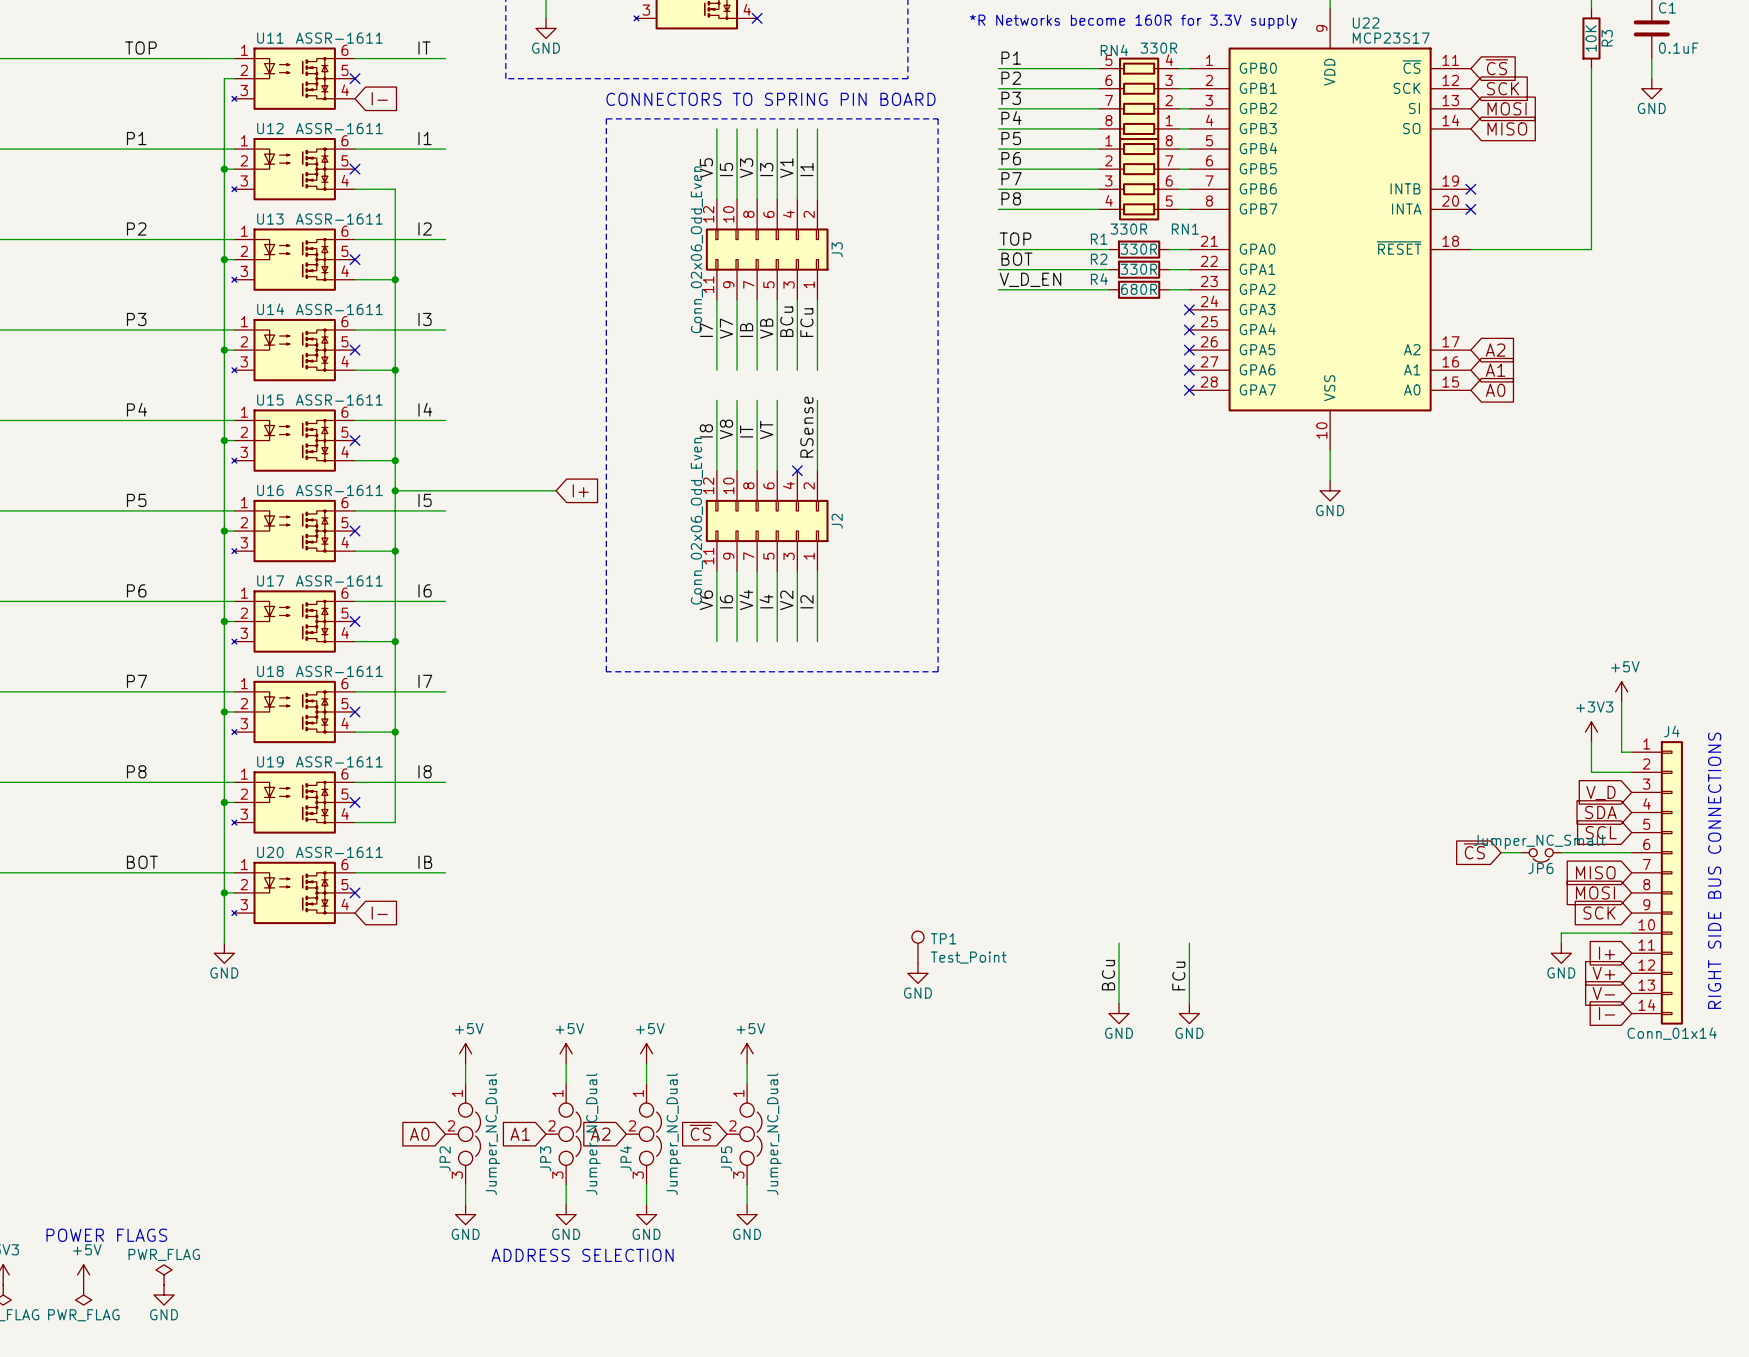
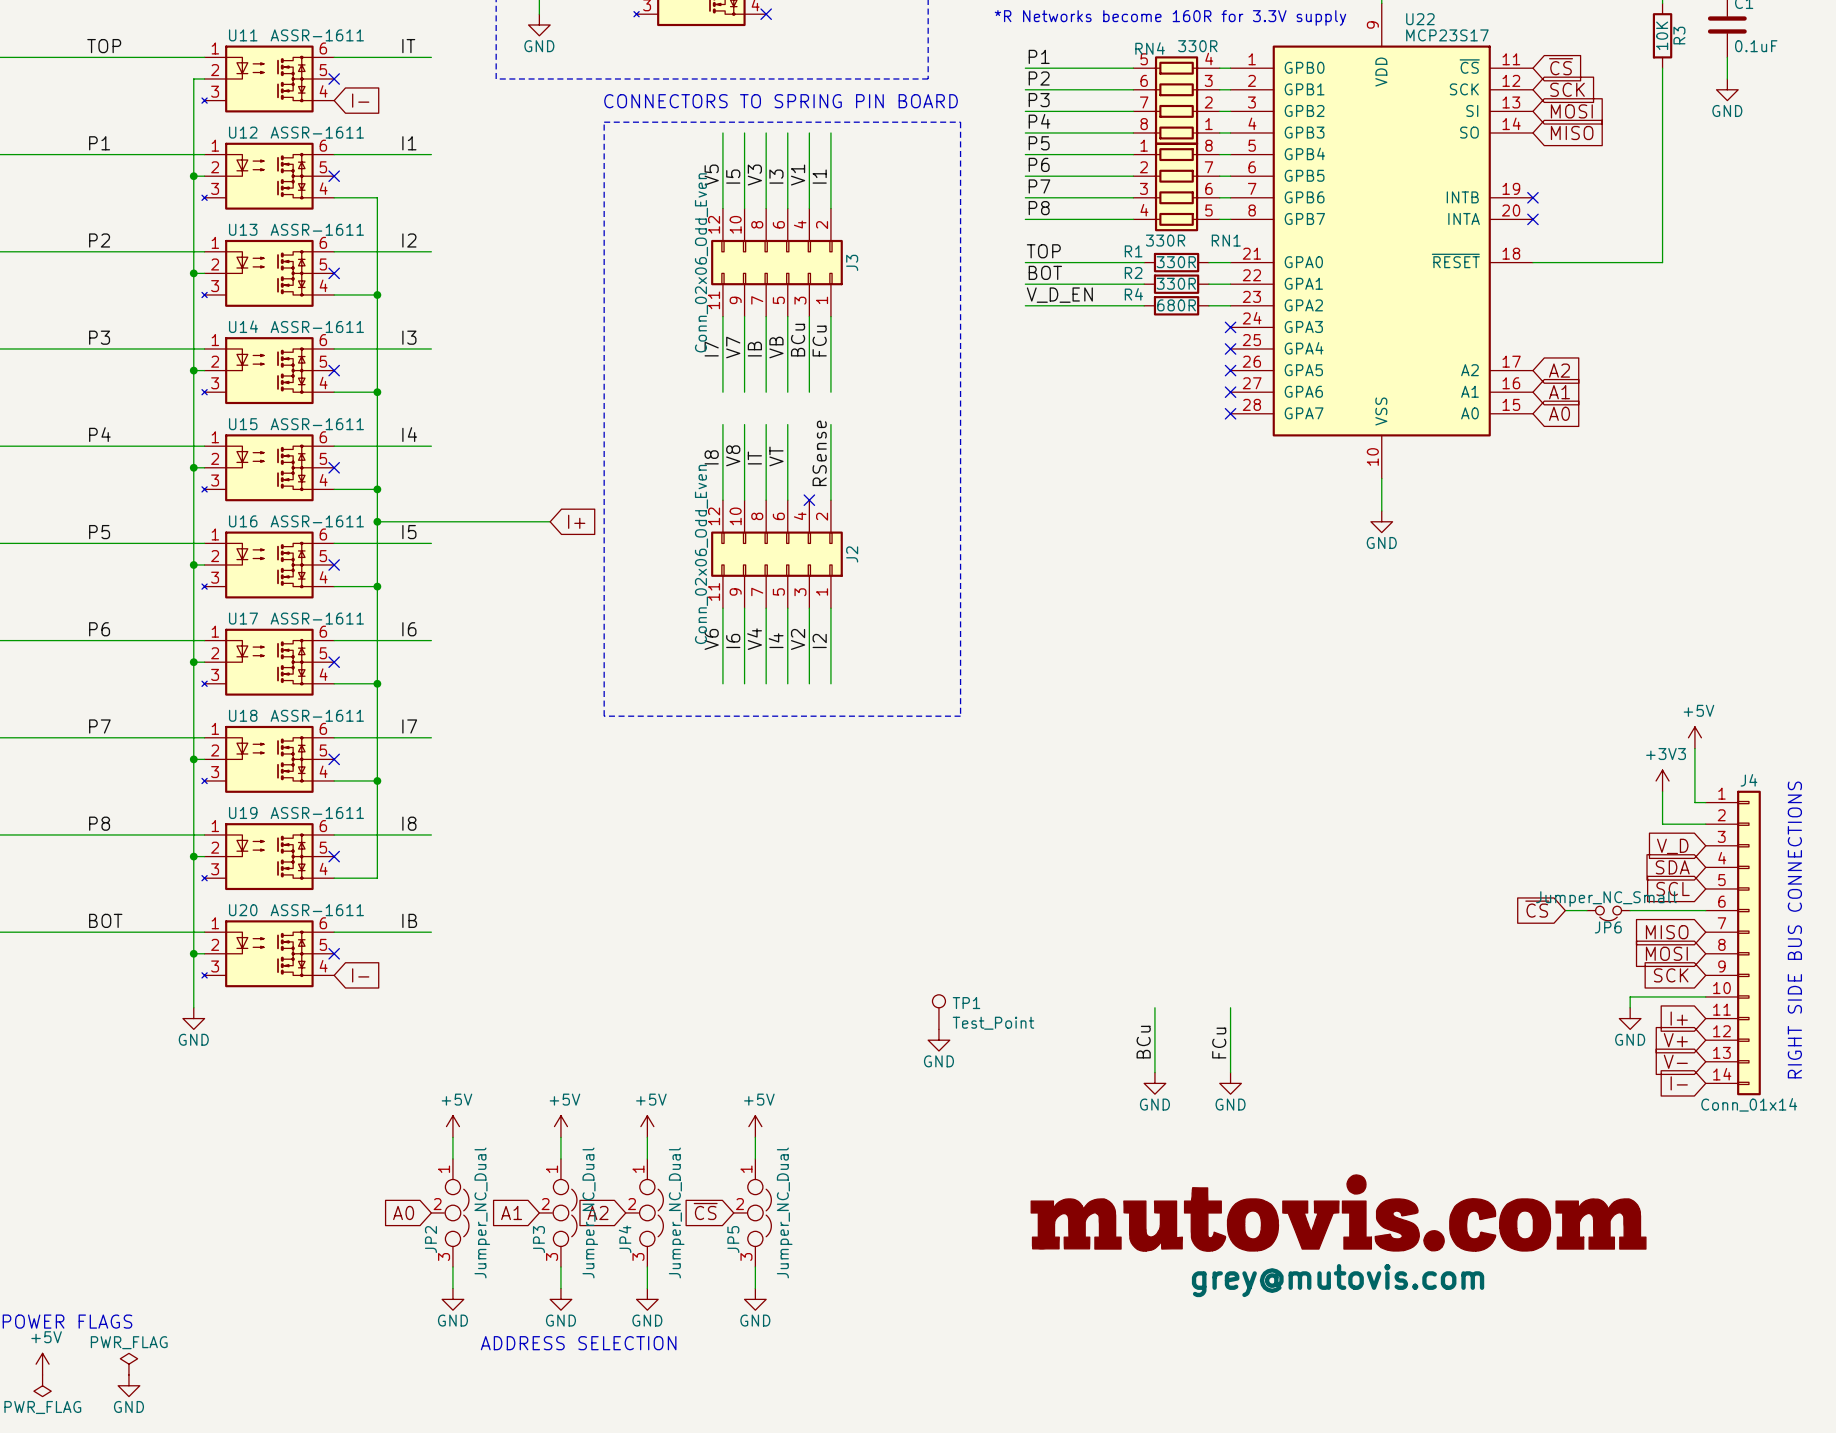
part: none -> grey@mutovis.com (1338, 1213)

